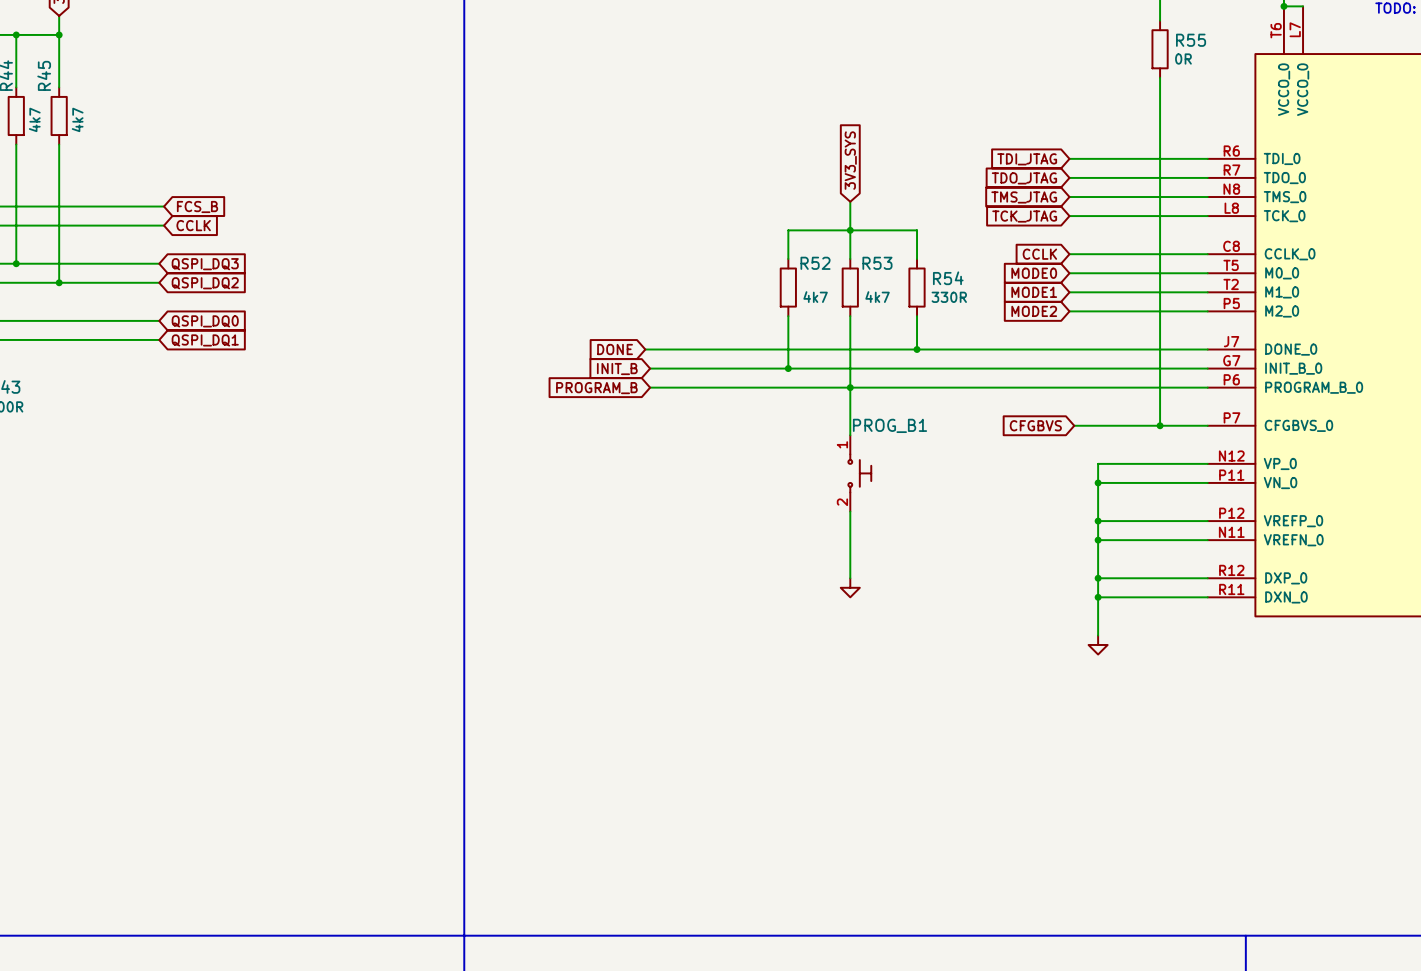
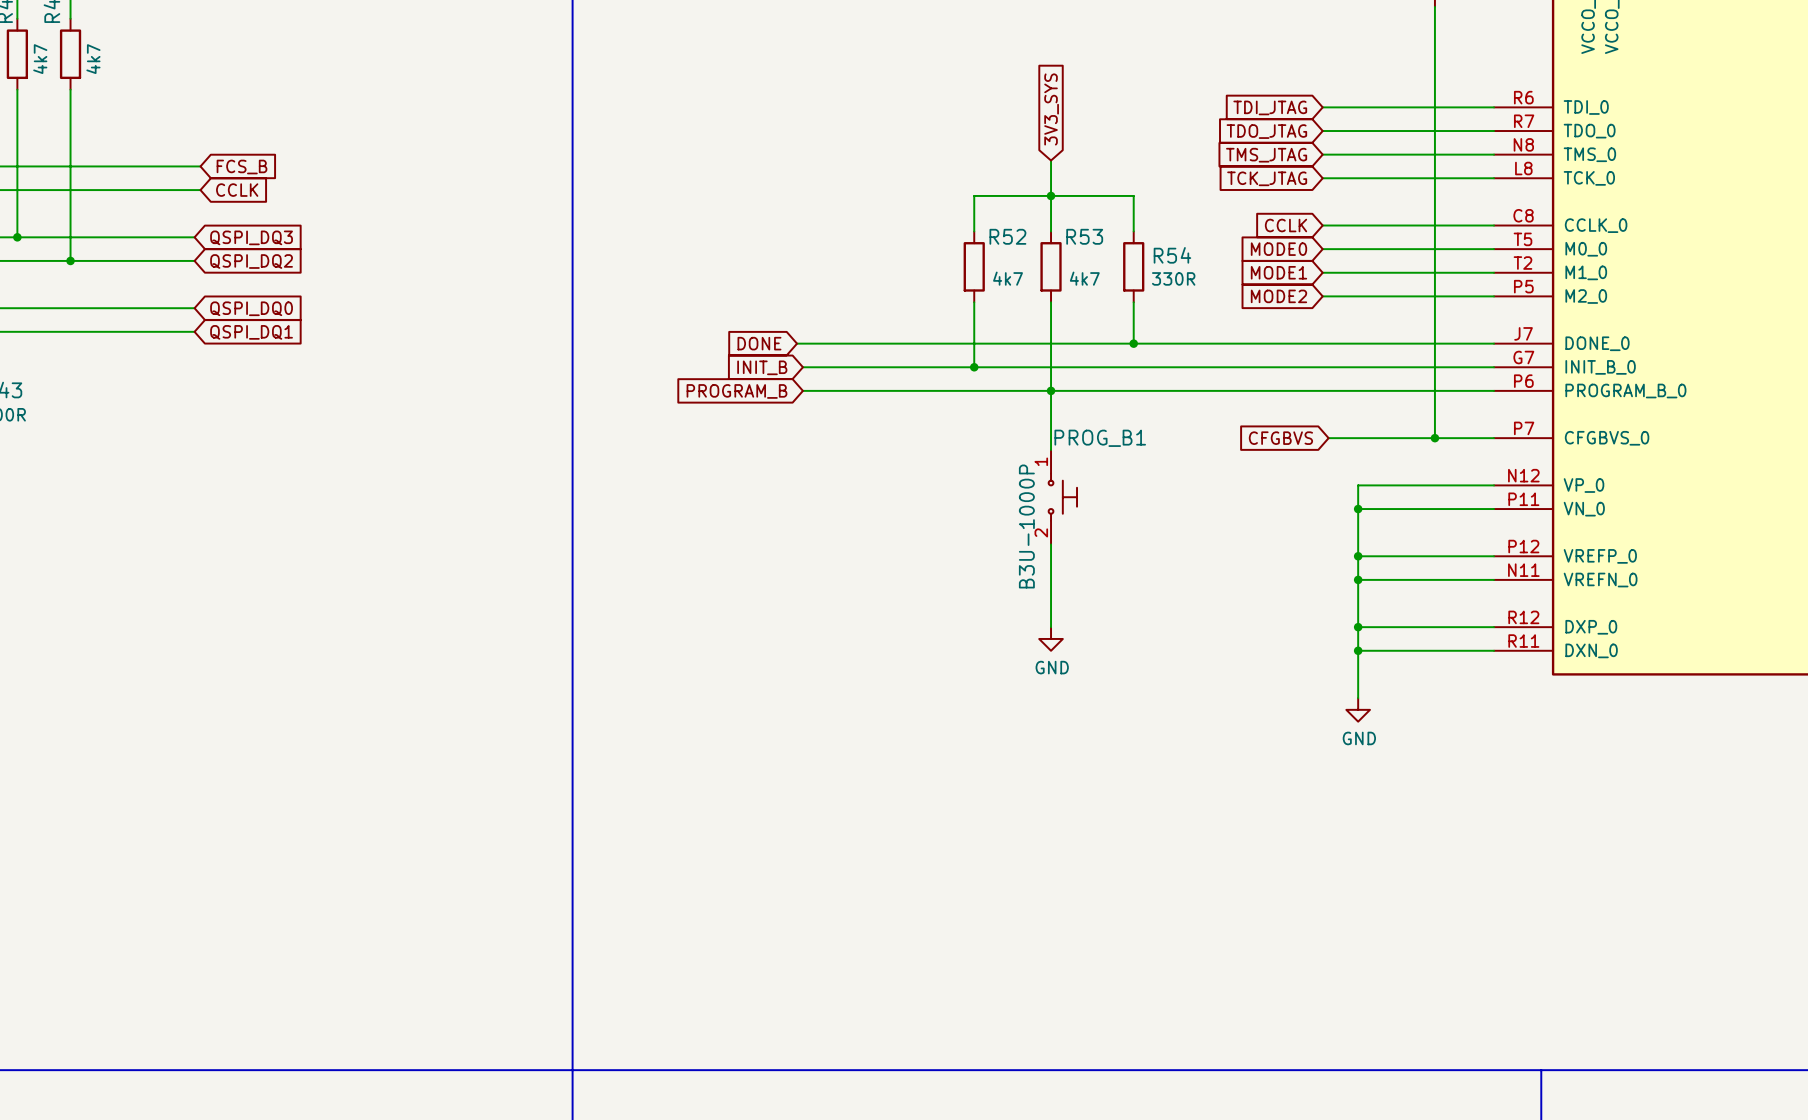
PROG_B1 value: none -> B3U-1000P (1026, 526)
power symbol text: none -> GND (1052, 667)
power symbol text: none -> GND (1359, 738)

